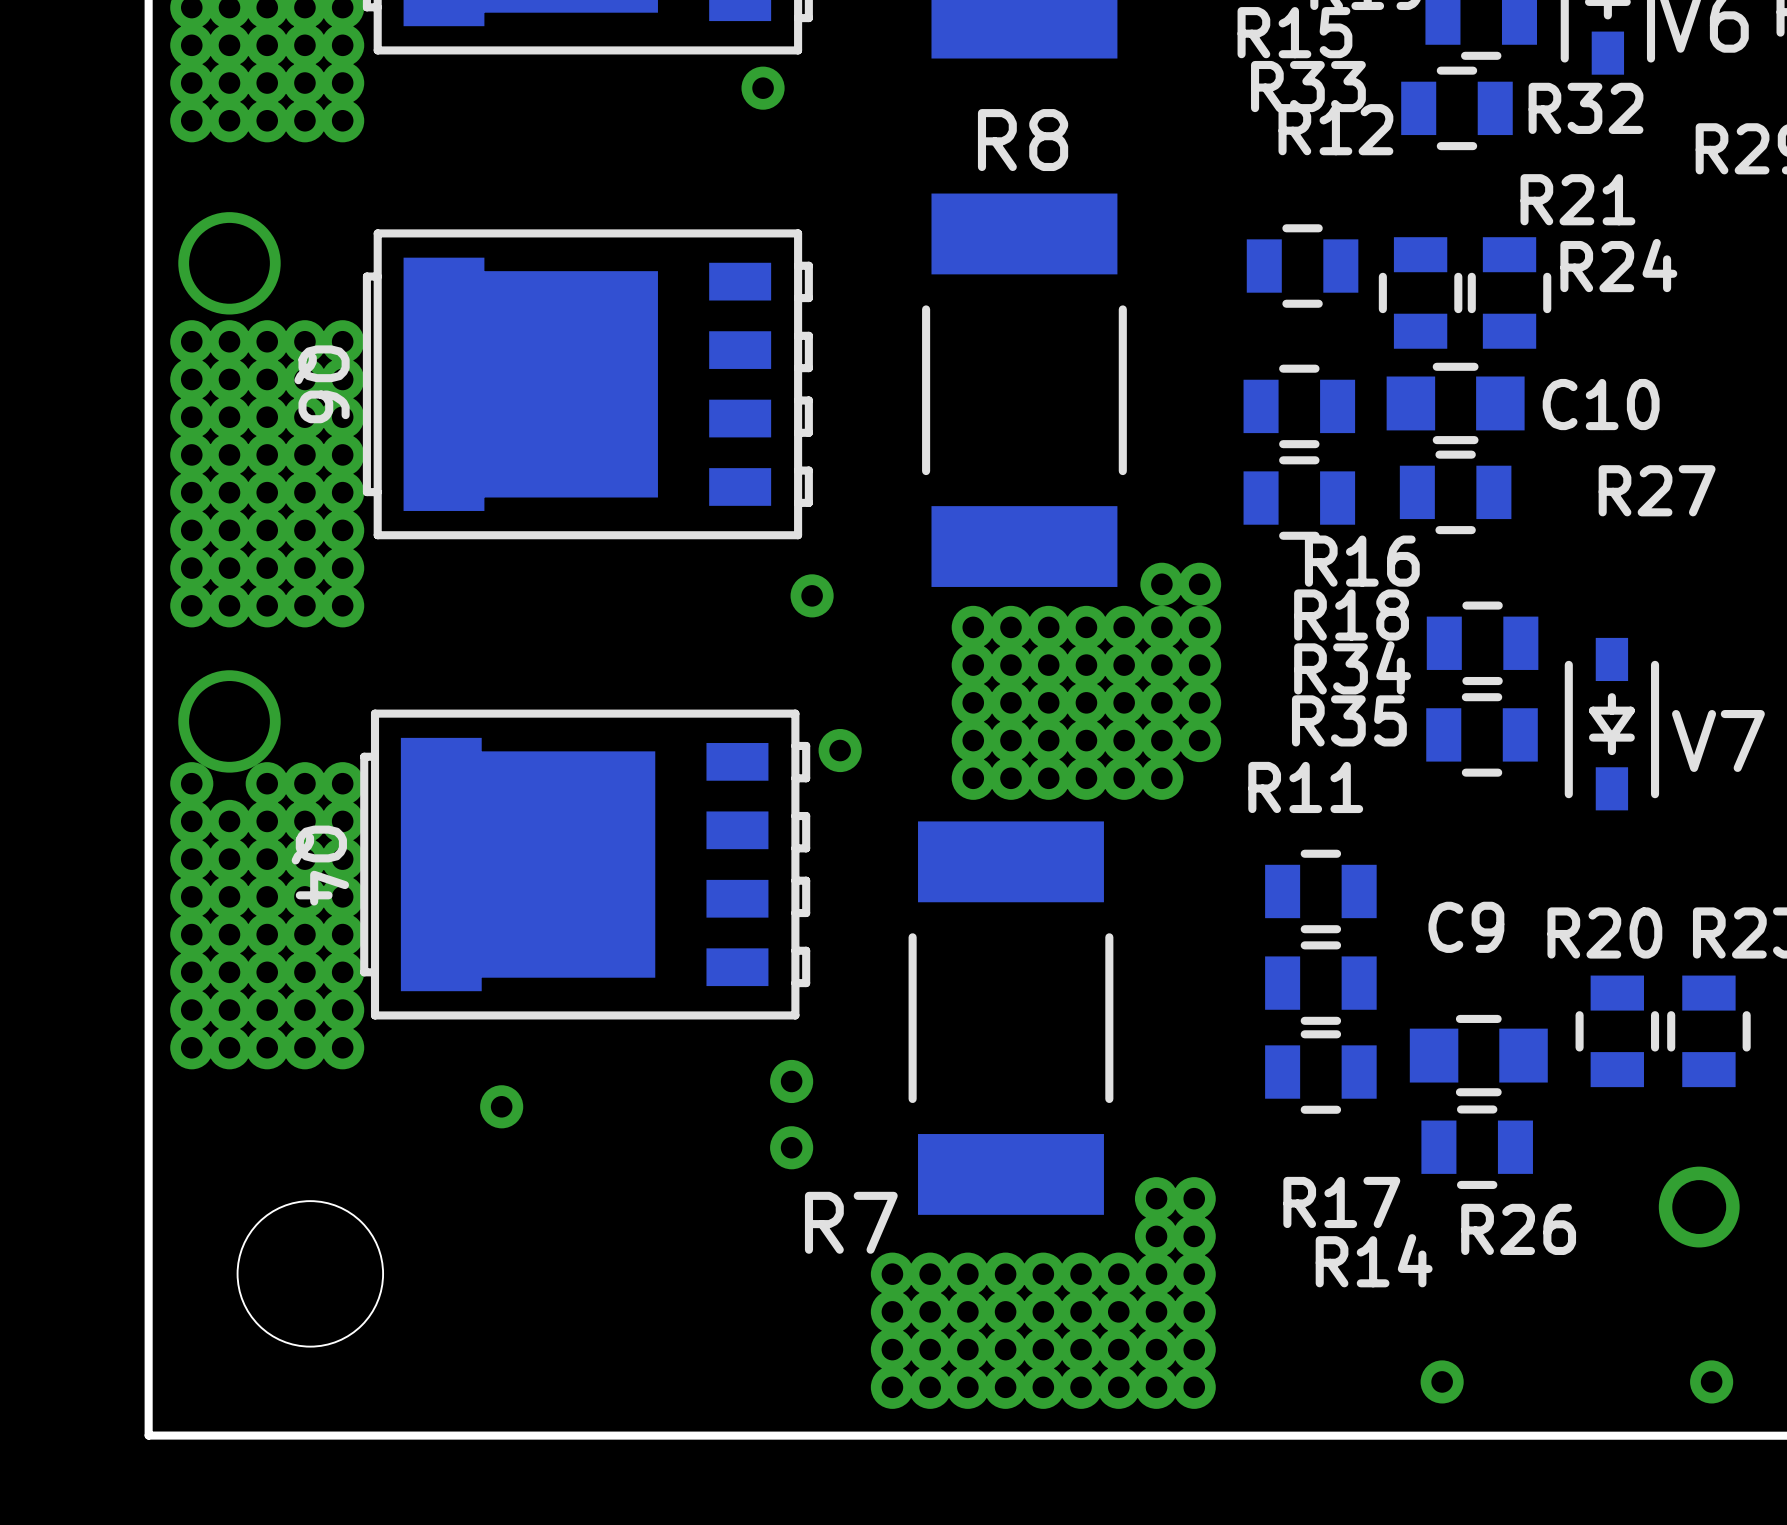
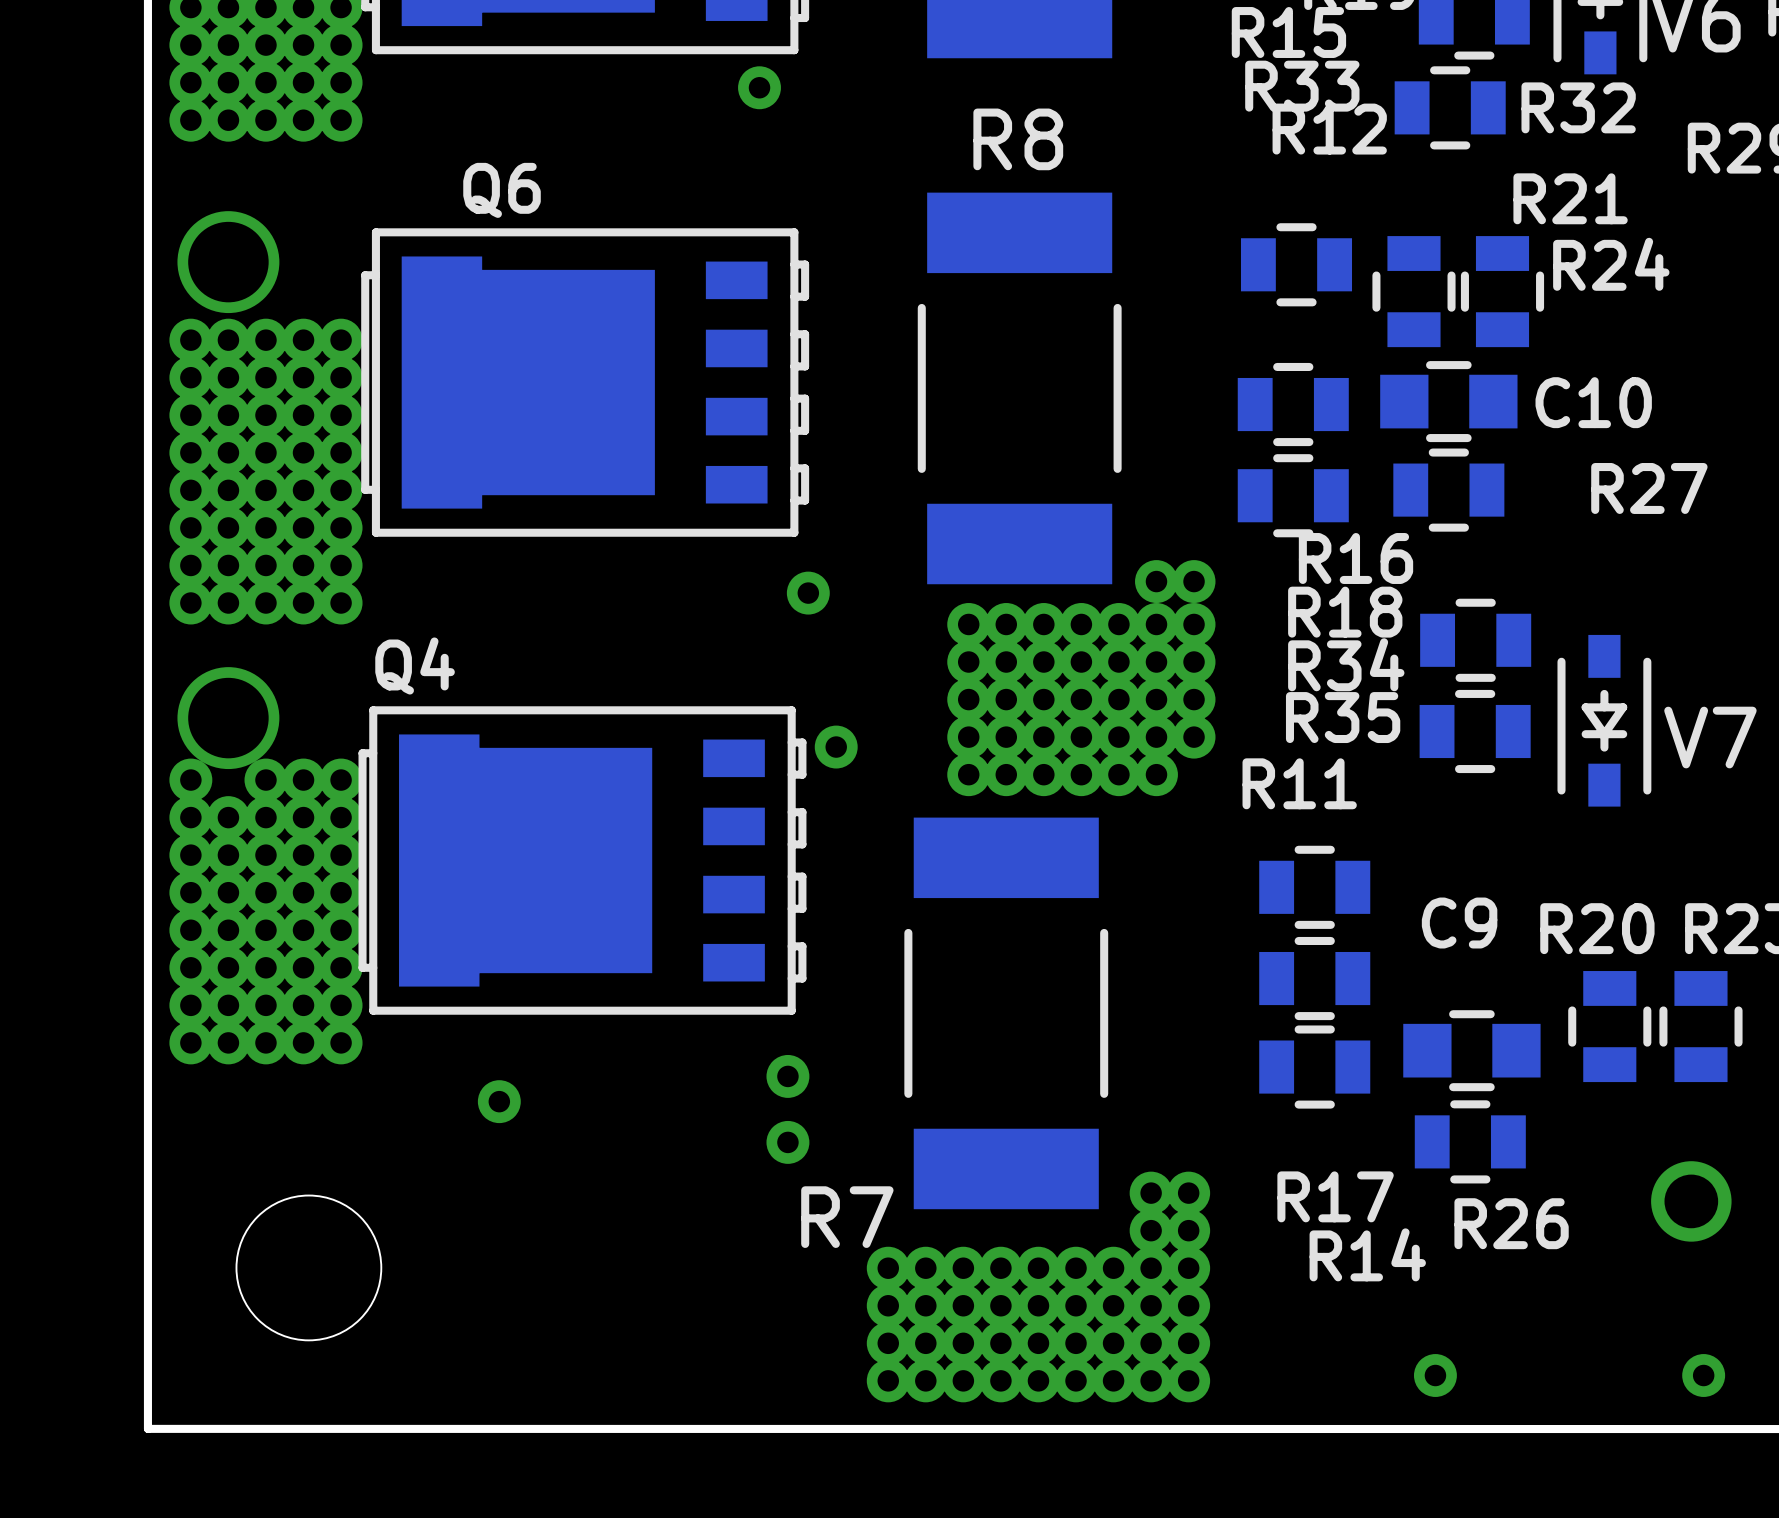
Q6 name rotation: 0° (322, 384) -> 90° counterclockwise (502, 190)
Q6 name position: Q6 (322, 384) -> Q6 (502, 190)
Q4 name rotation: 0° (320, 865) -> 90° counterclockwise (415, 666)
Q4 name position: Q4 (320, 865) -> Q4 (415, 666)

